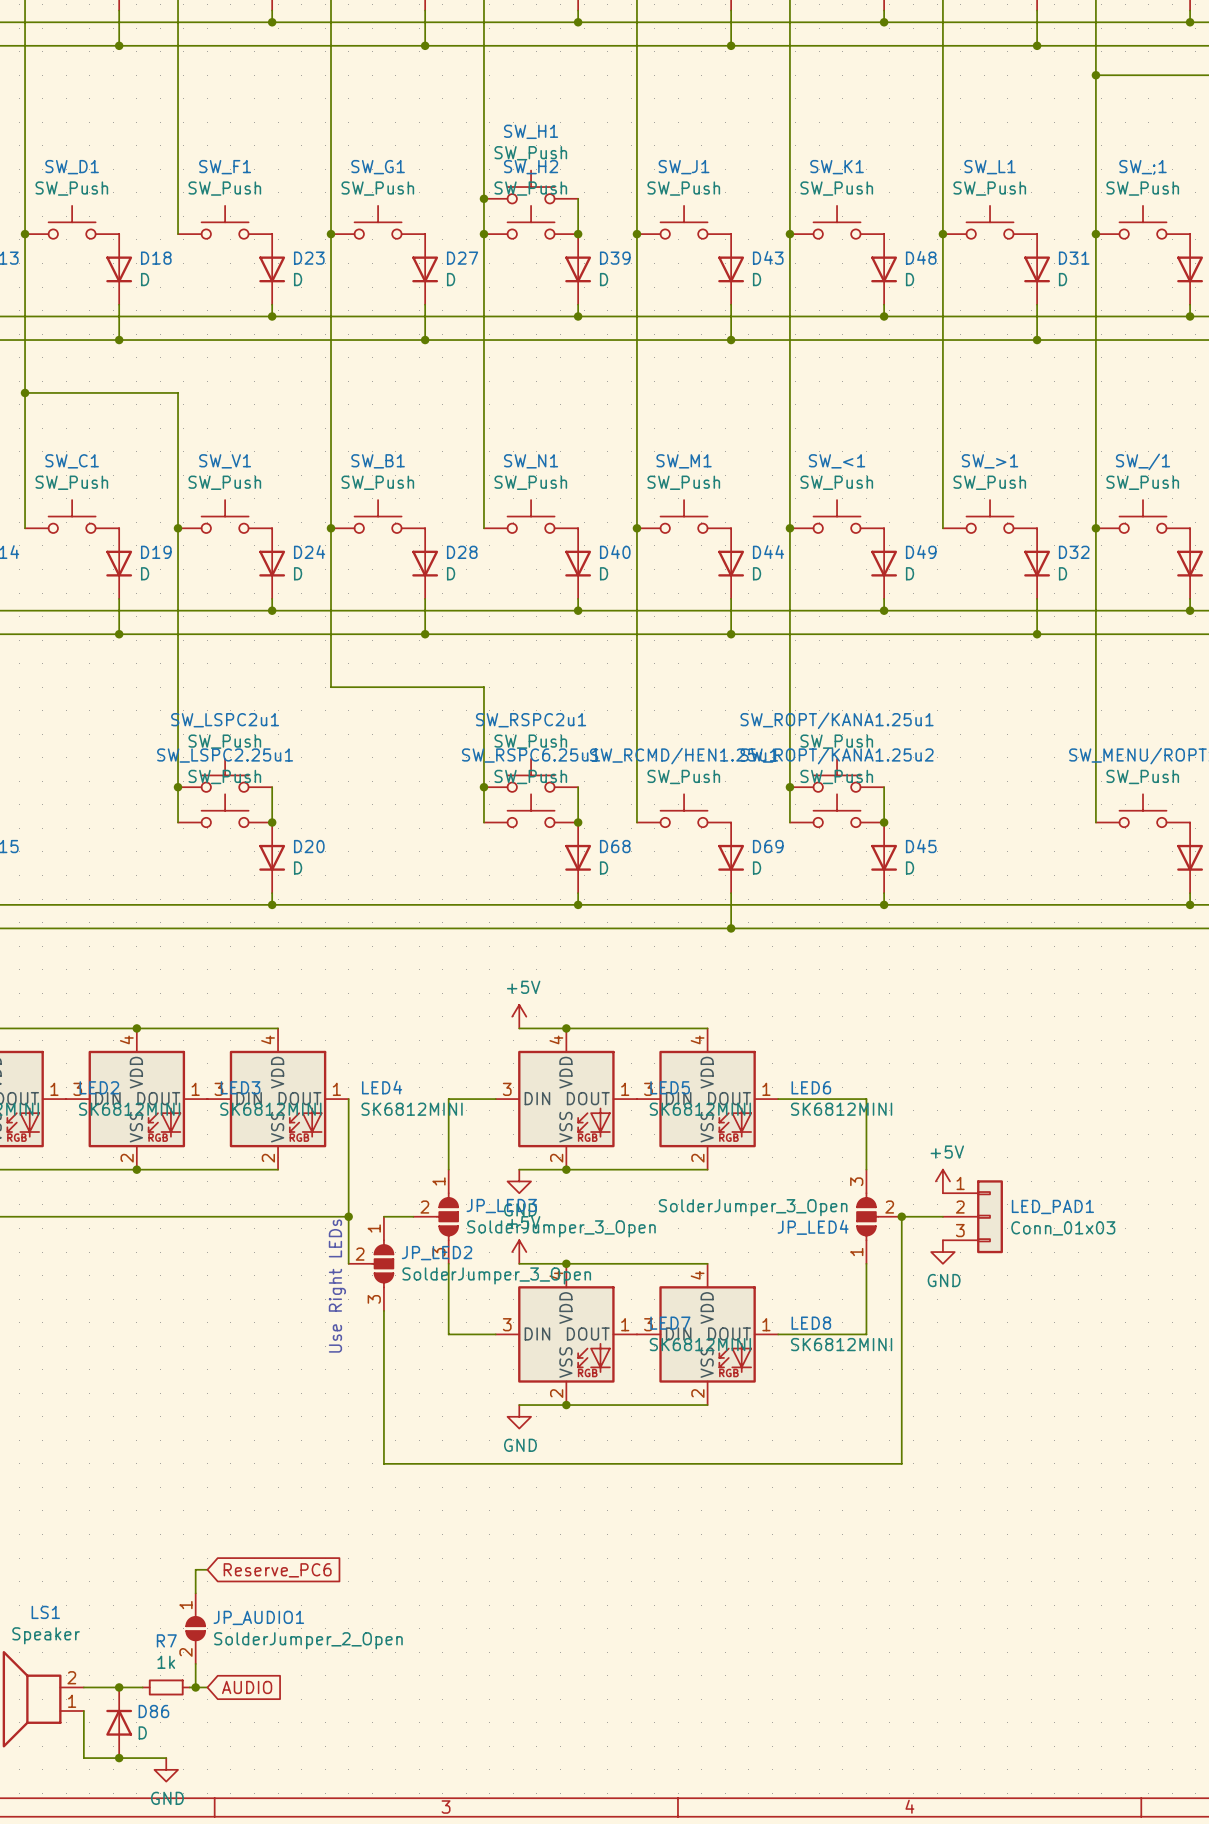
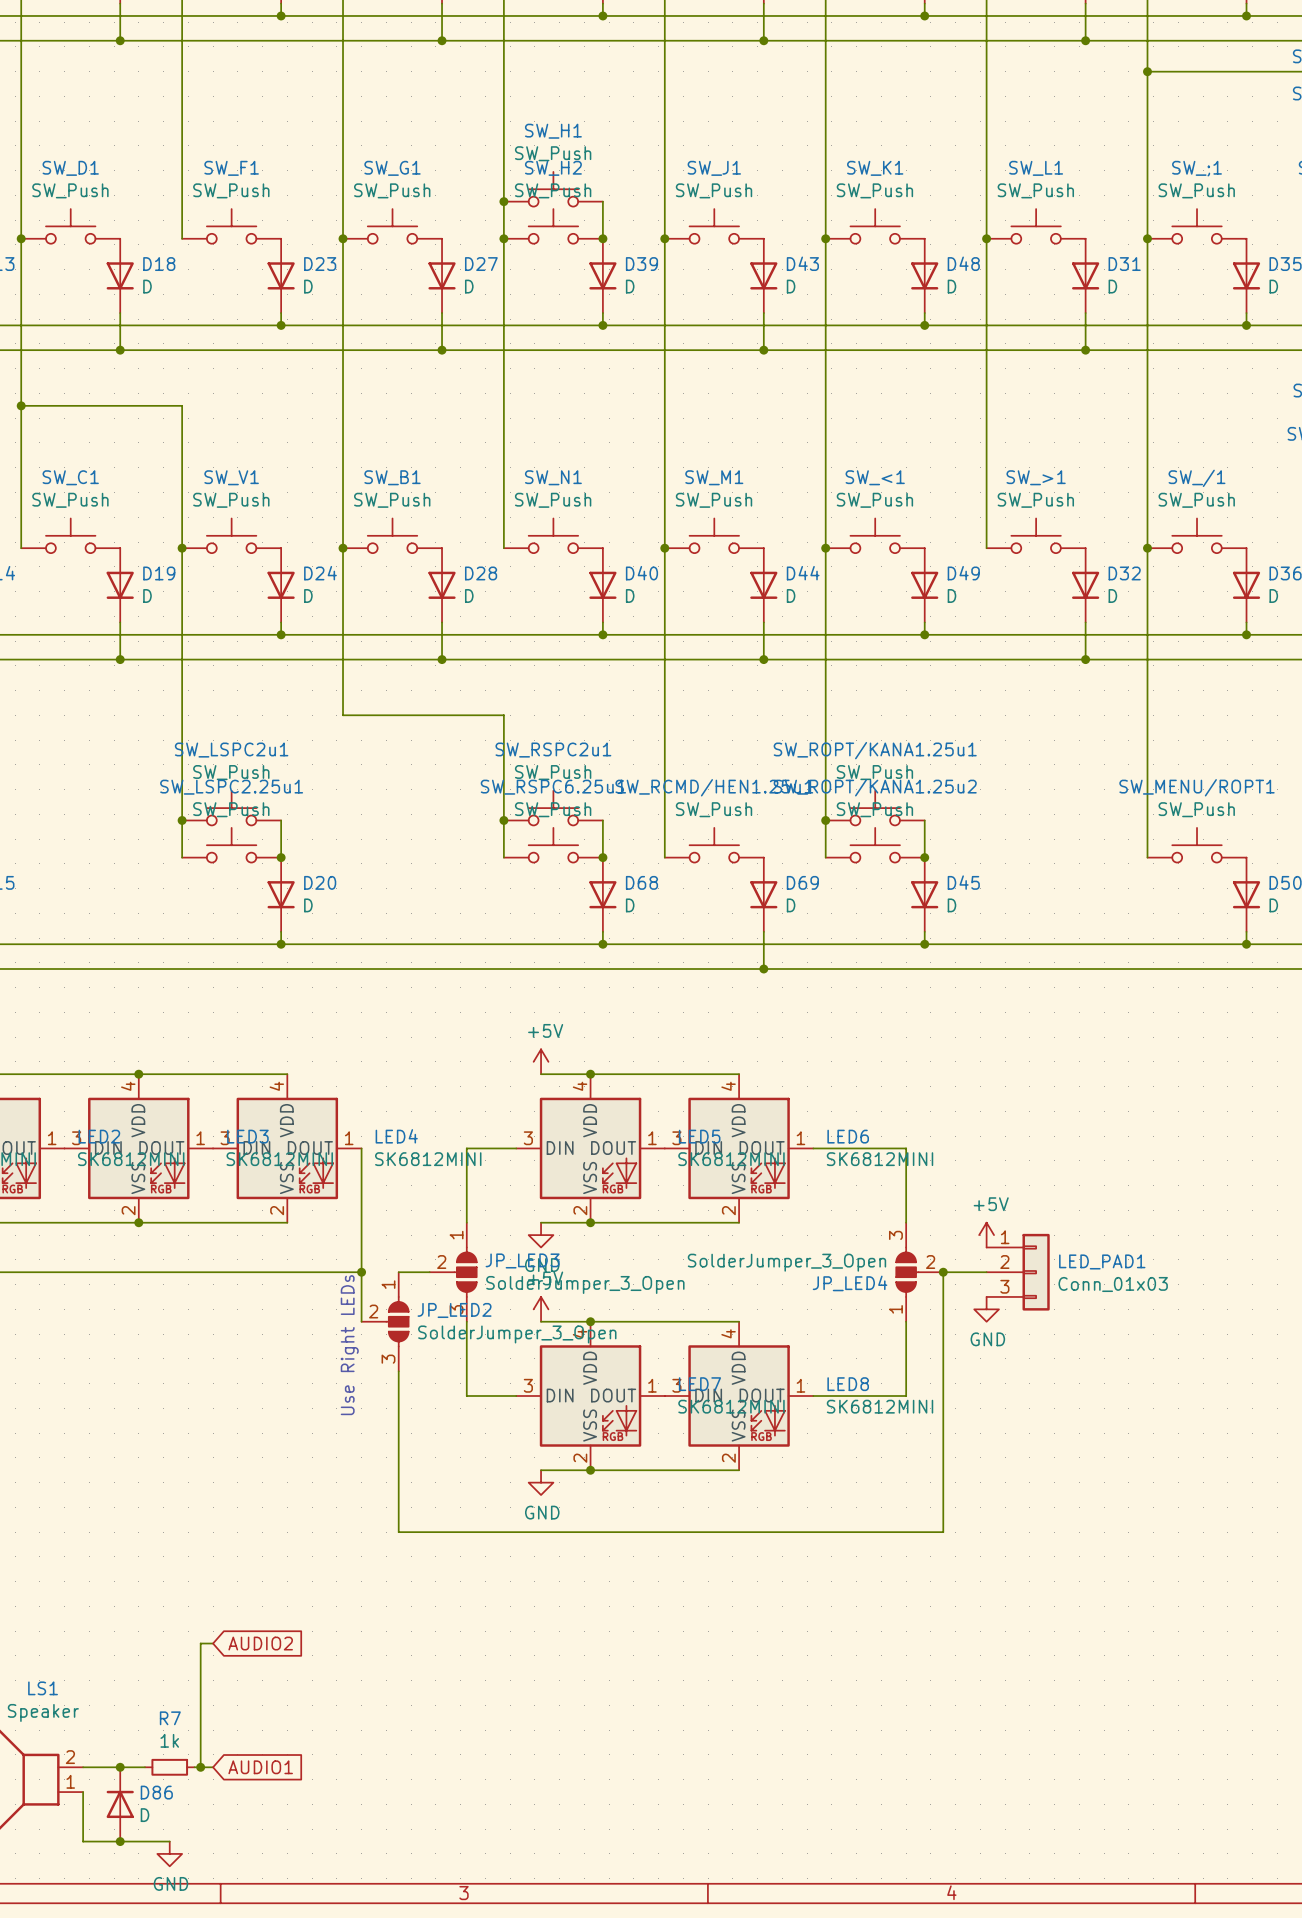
global label: Reserve_PC6 (277, 1570) -> AUDIO2 (260, 1643)
JP_AUDIO1: SolderJumper_2_Open (195, 1628) -> none
global label: AUDIO (247, 1687) -> AUDIO1 (260, 1767)

